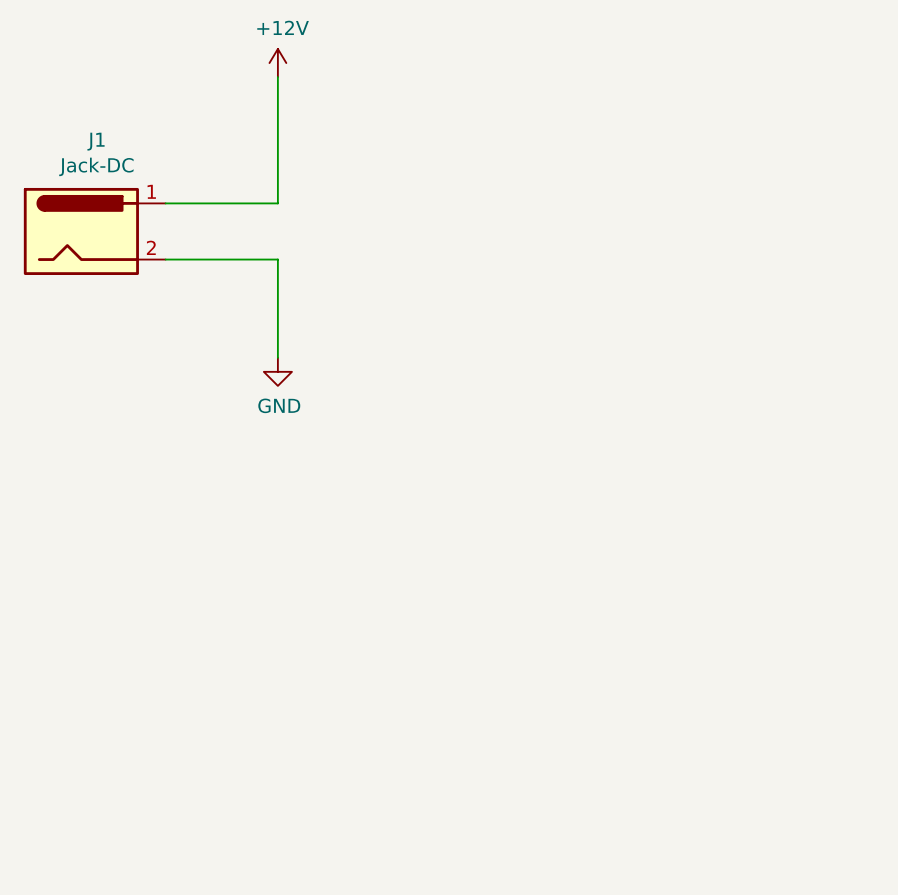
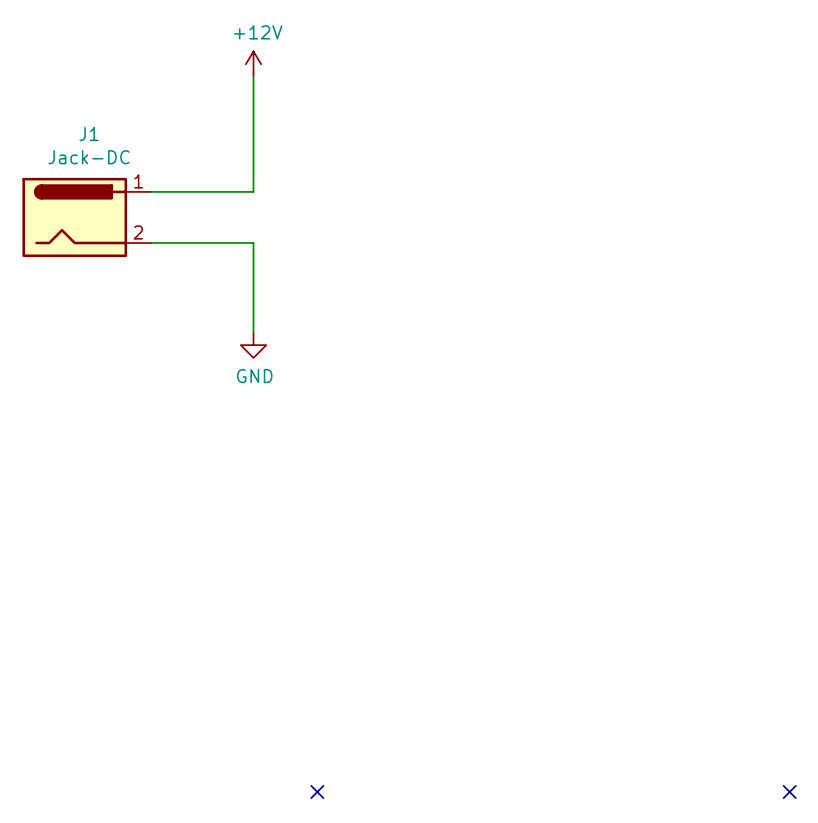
no-connect mark: none -> (317, 791)
no-connect mark: none -> (789, 791)

